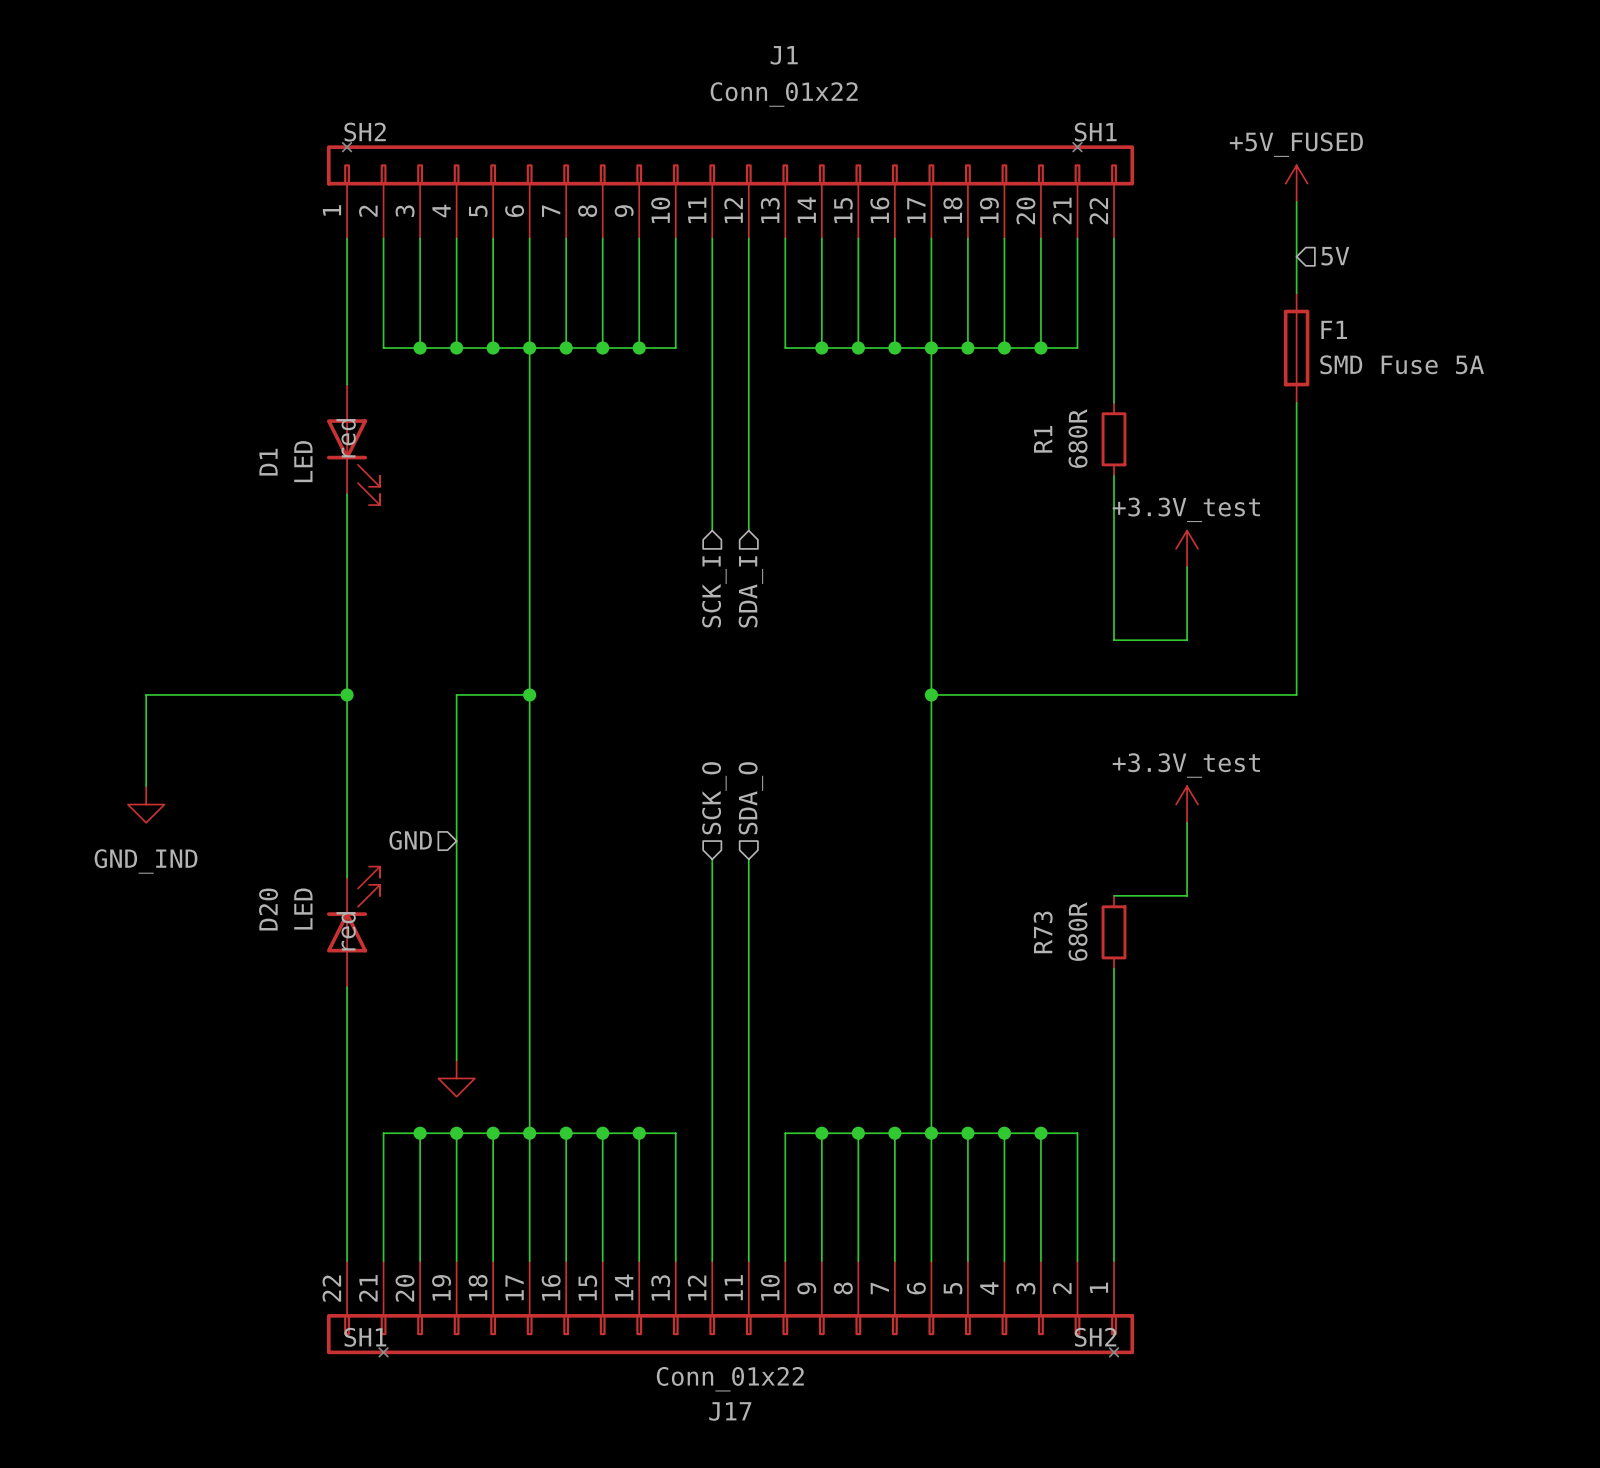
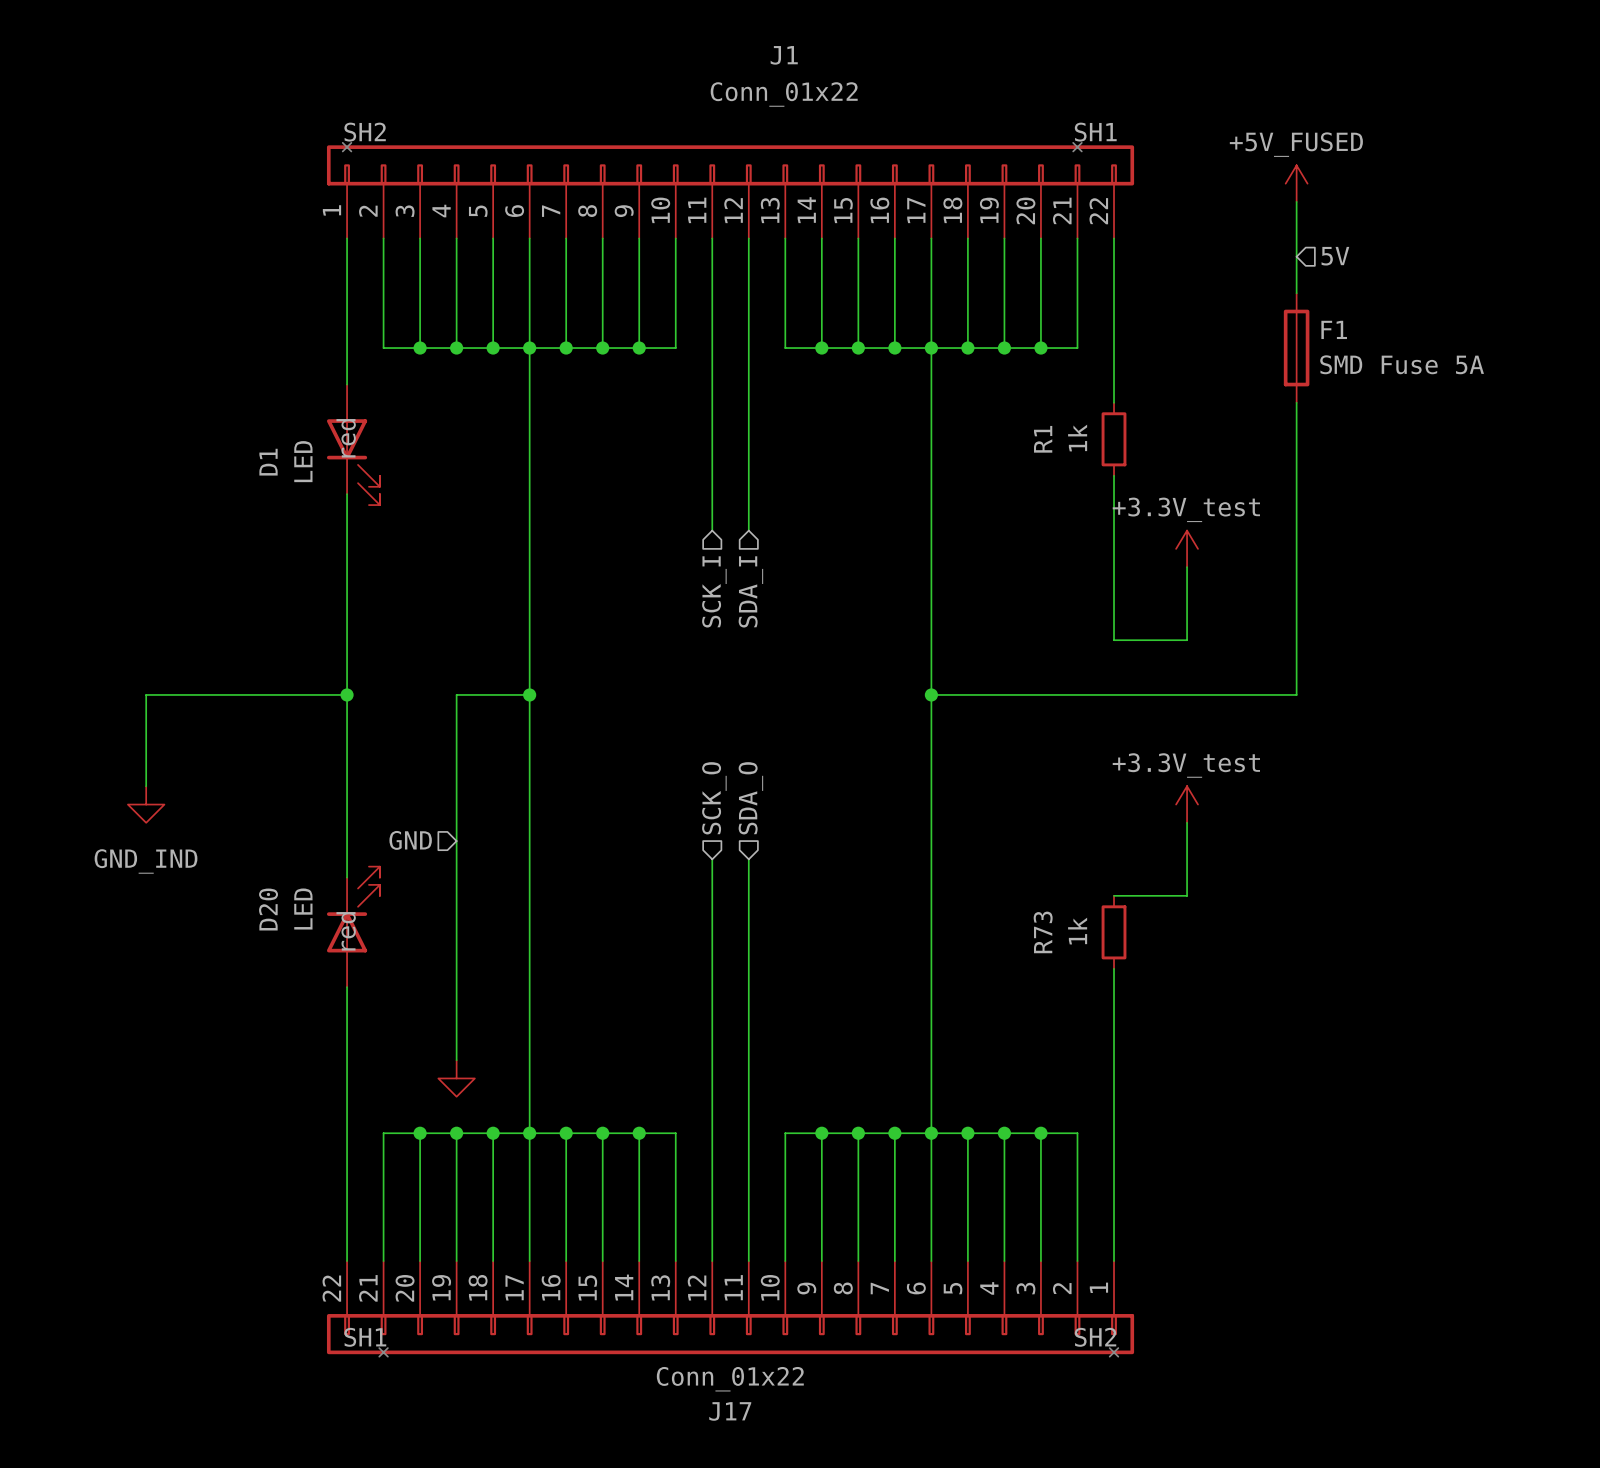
R1 value: 680R (1078, 438) -> 1k (1077, 438)
R73 value: 680R (1078, 931) -> 1k (1077, 931)

